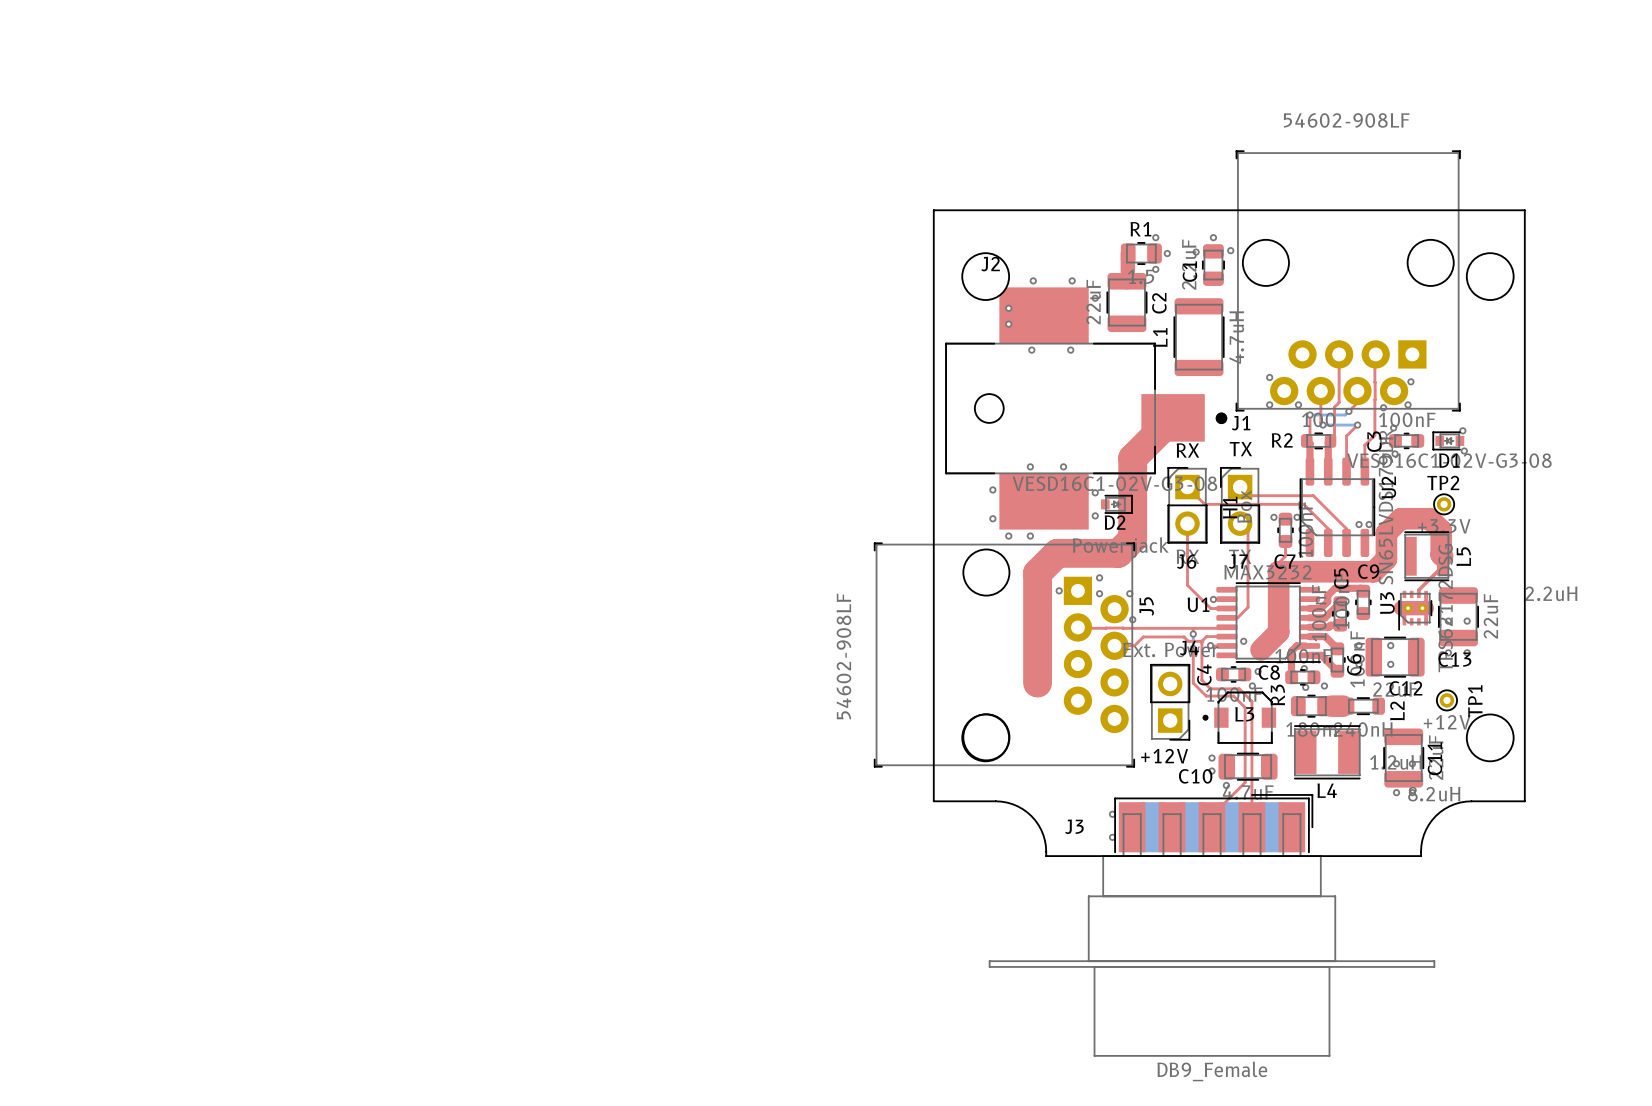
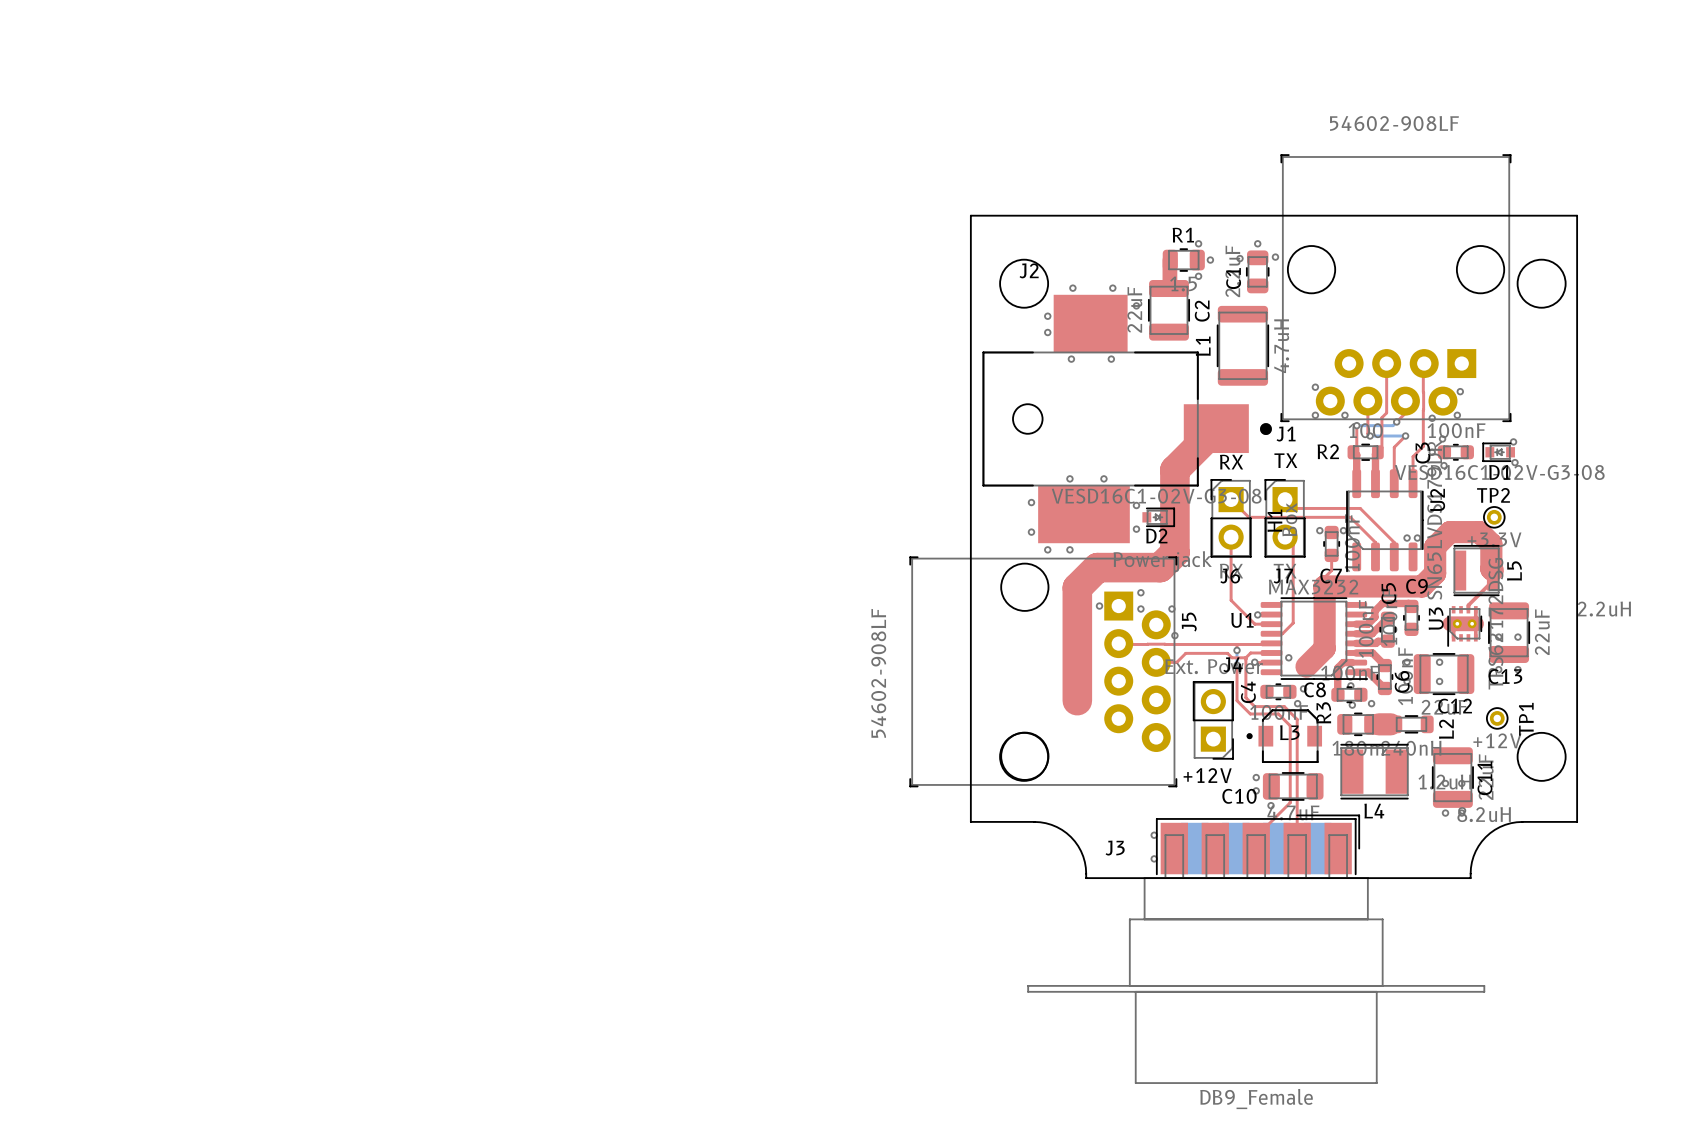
J2 footprint: [945, 287, 1228, 530] -> [982, 294, 1272, 544]

